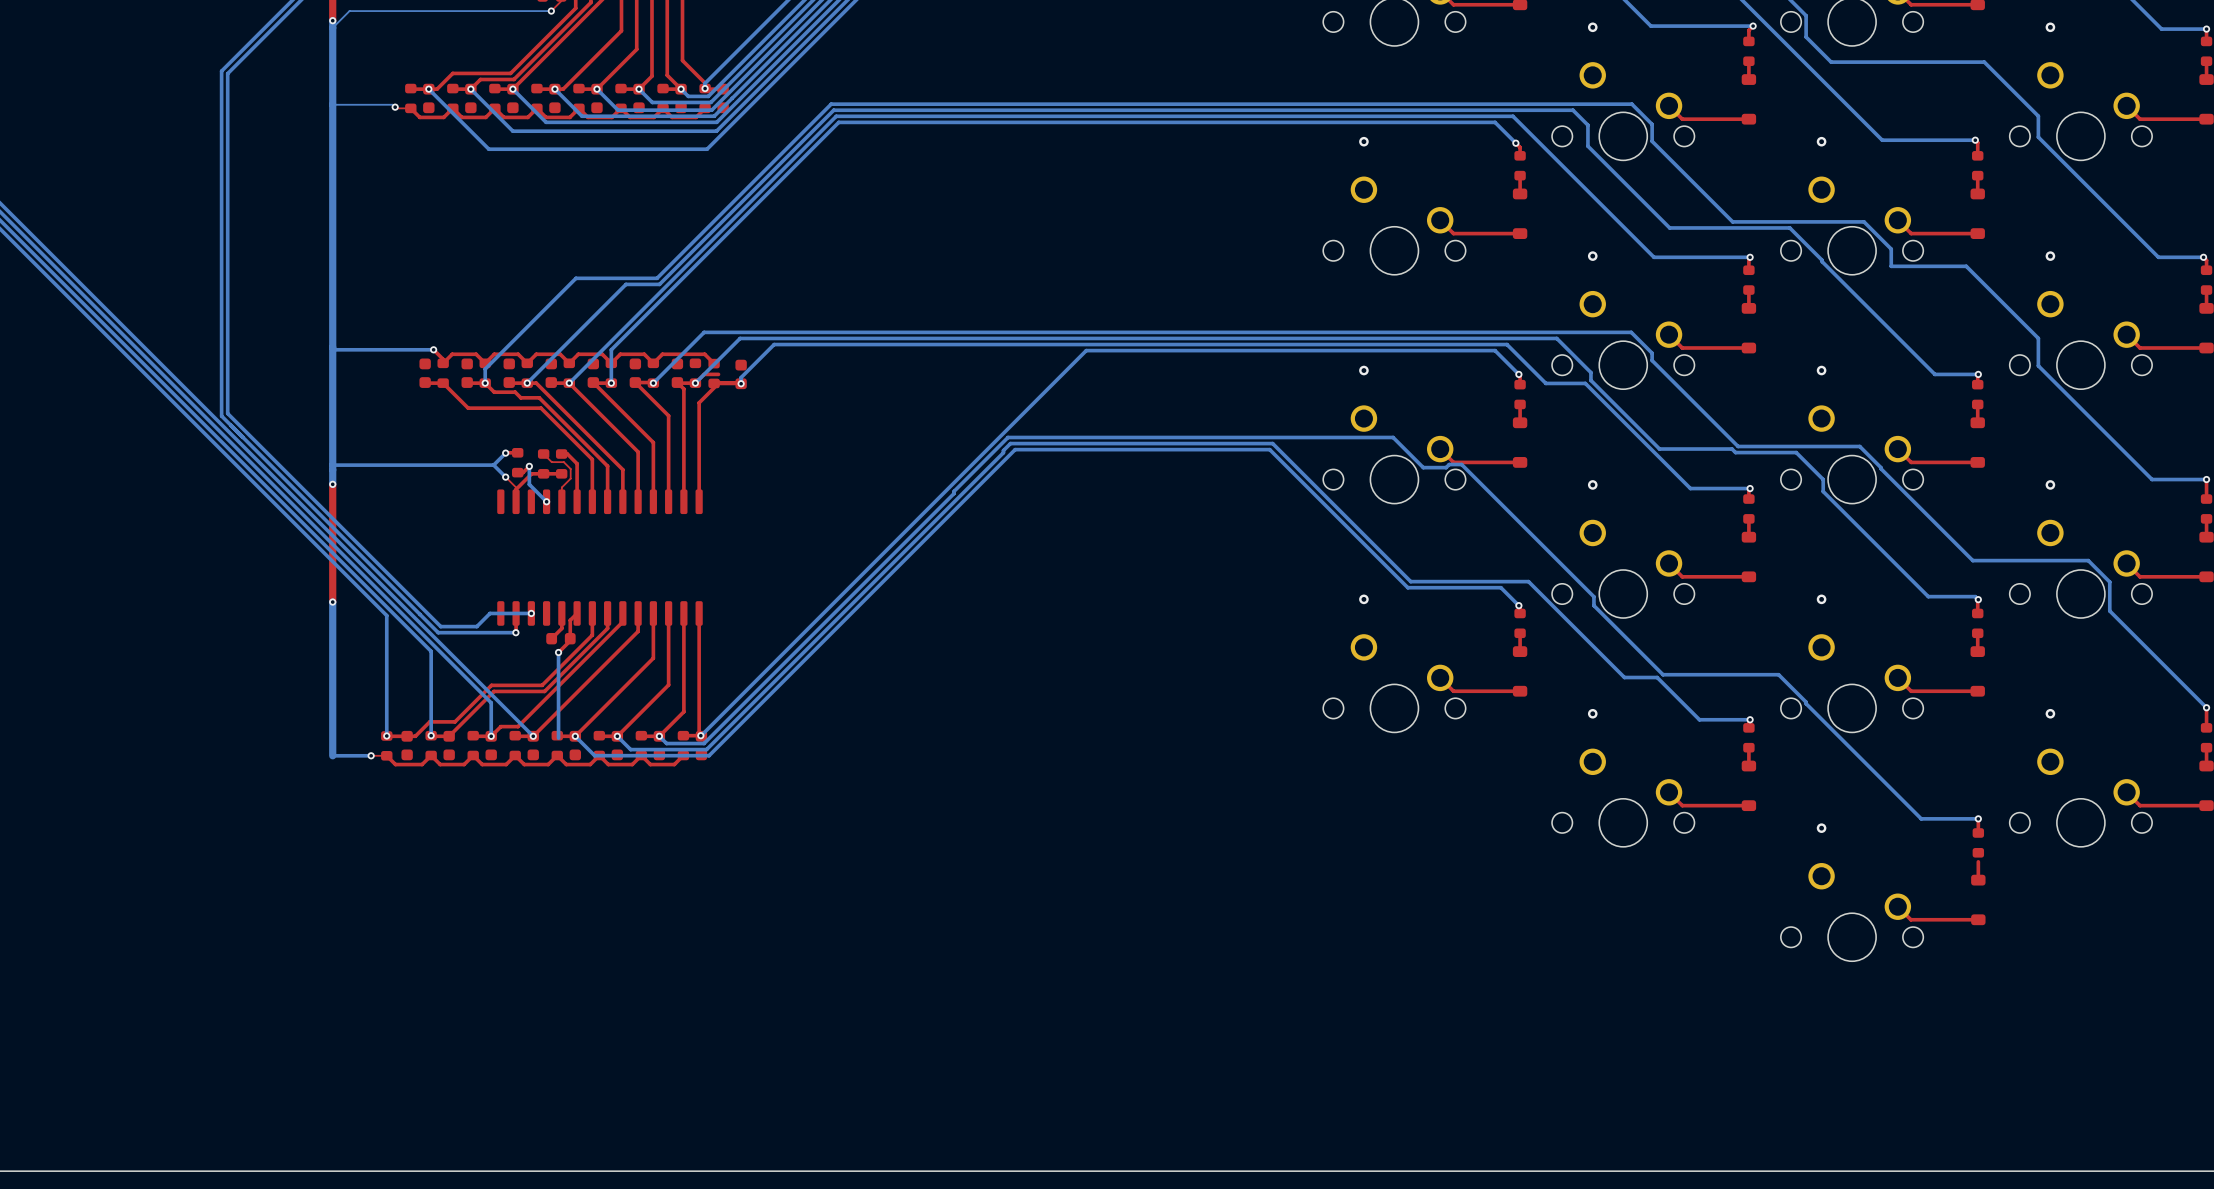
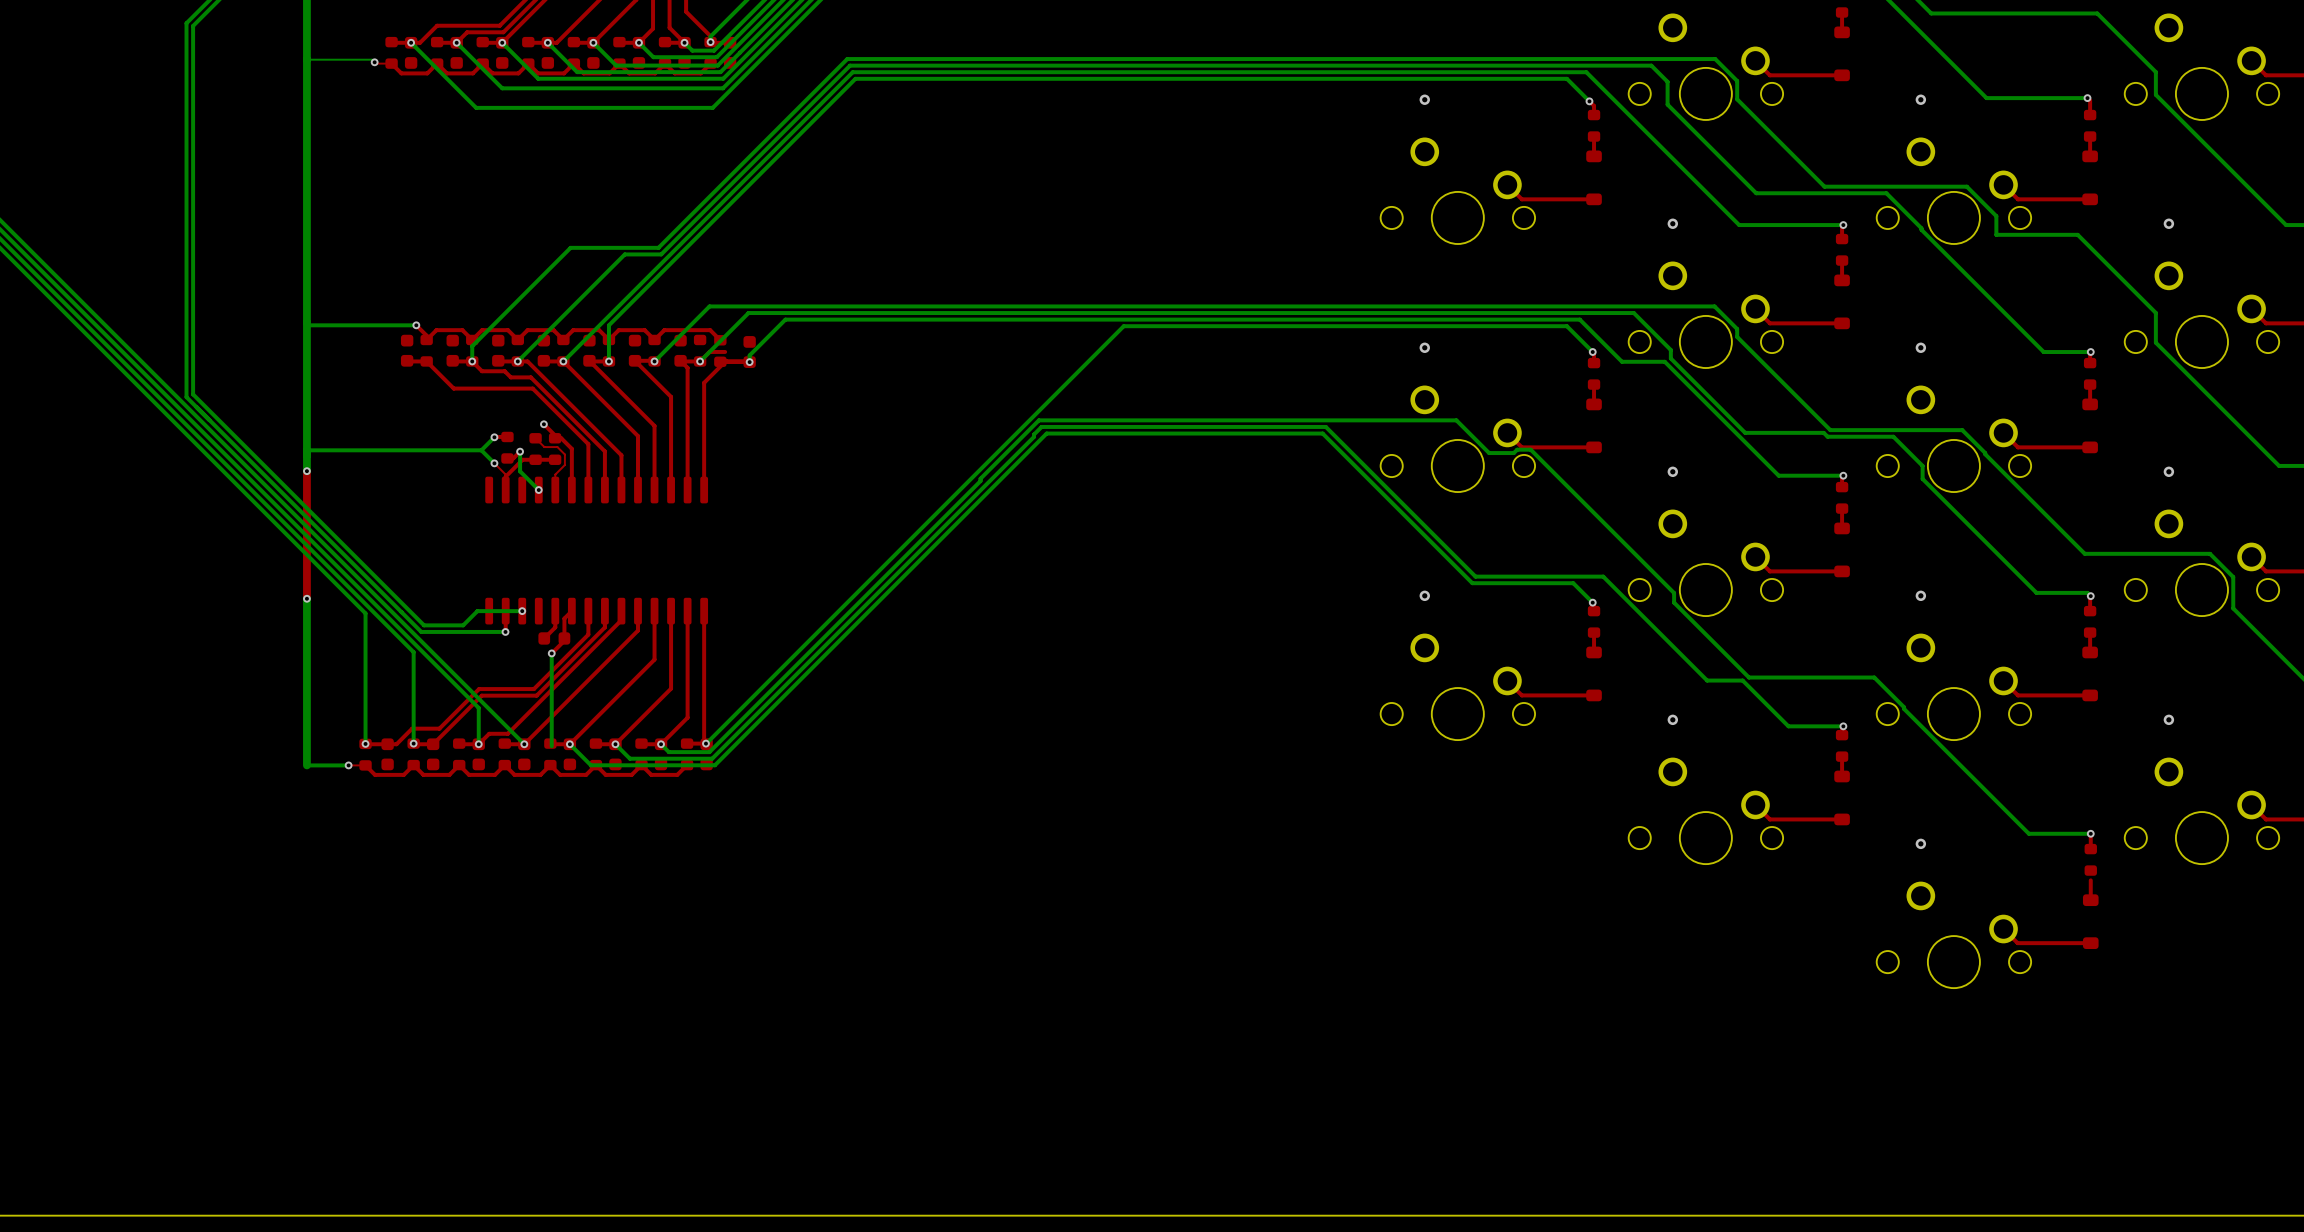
top track: none -> (543, 424) (555, 435) (555, 438)
via: none -> (543, 424)

